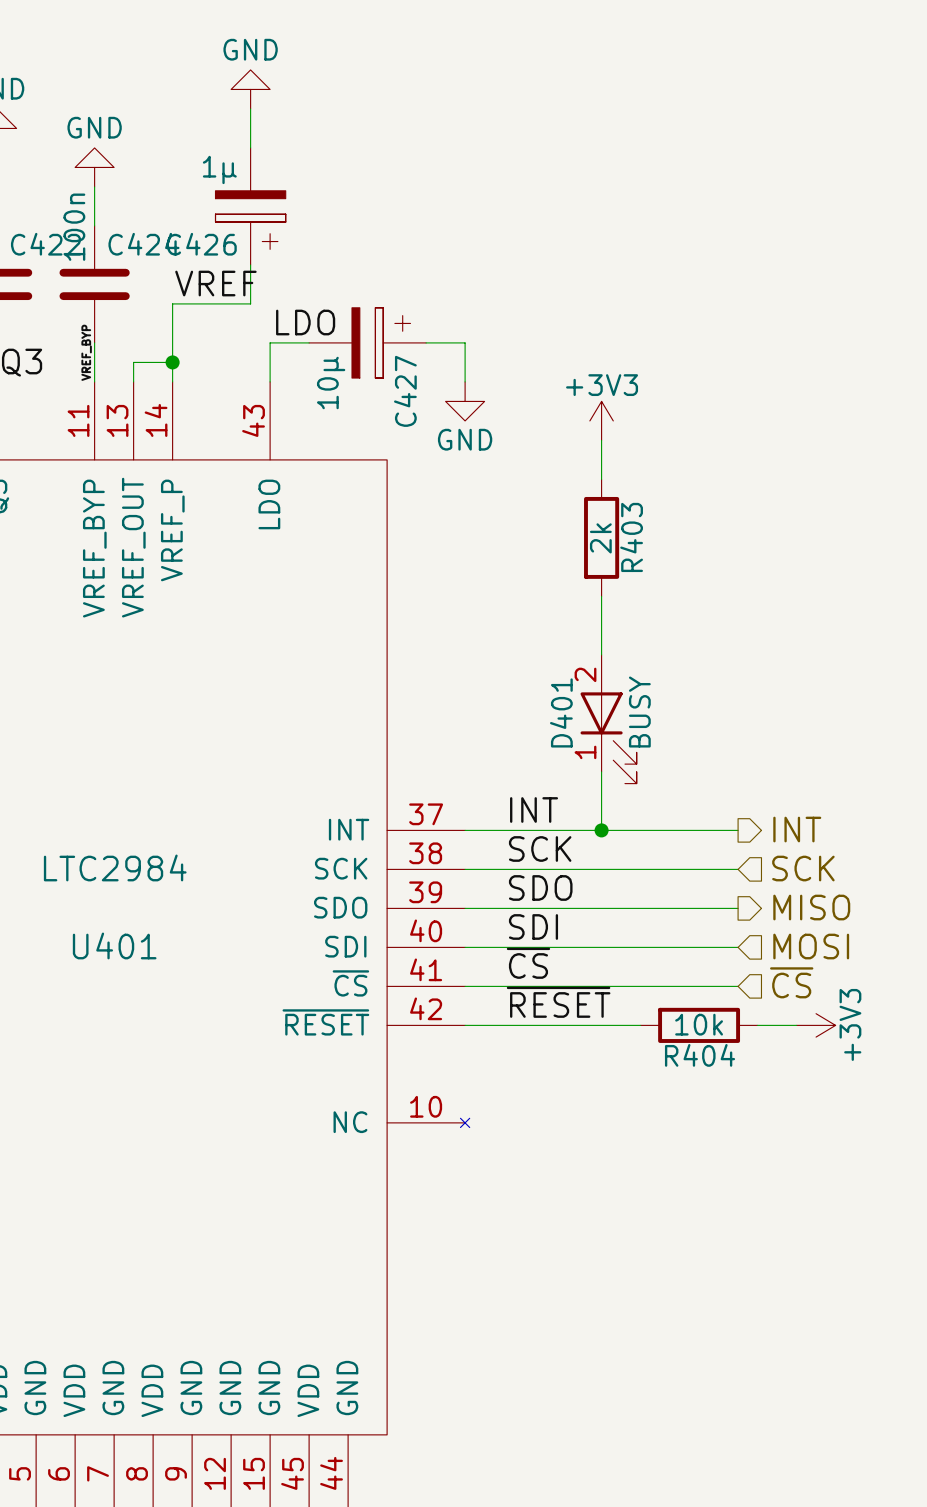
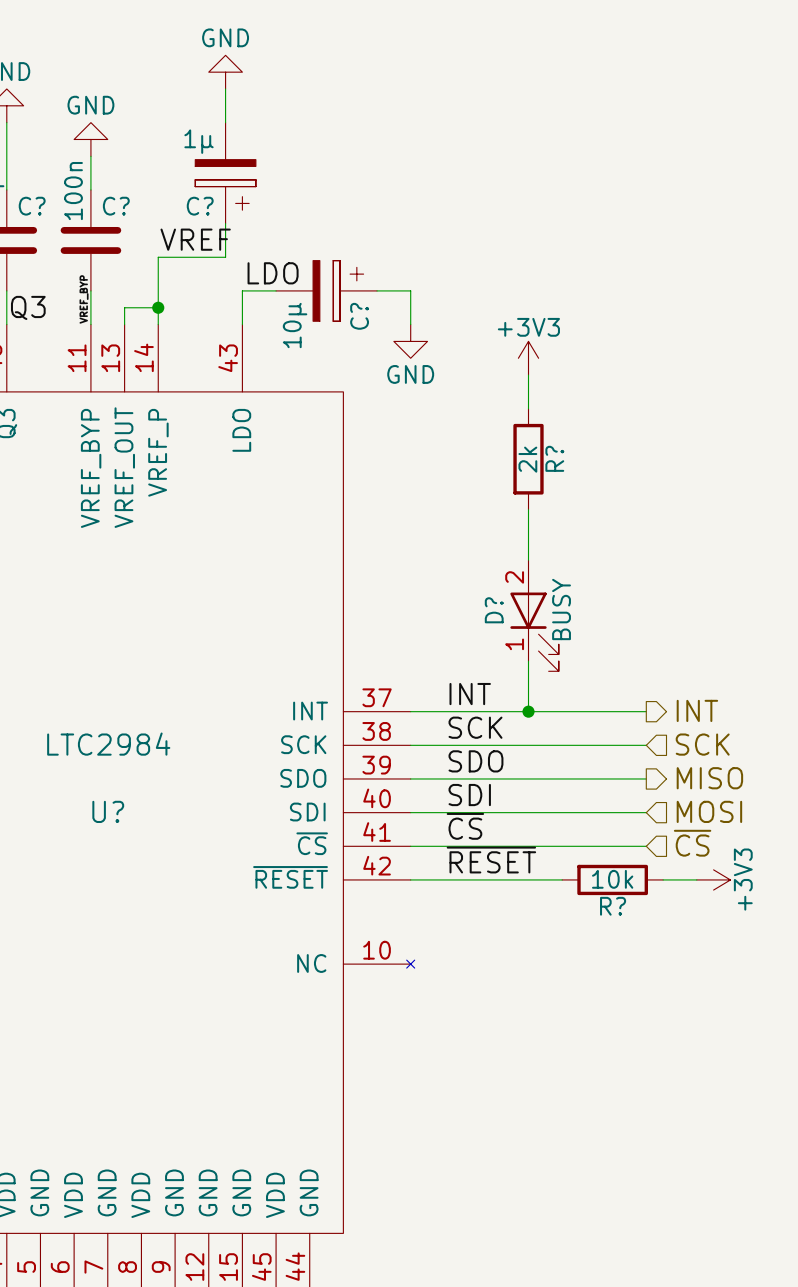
C422 name: C422 (46, 244) -> C? (32, 206)
C424 name: C424 (143, 244) -> C? (116, 206)
C426 name: C426 (201, 244) -> C? (200, 206)
C427 name: C427 (405, 391) -> C? (359, 316)
R403 name: R403 (631, 537) -> R? (554, 458)
D401 name: D401 (561, 712) -> D? (494, 610)
U401 name: U401 (114, 945) -> U? (108, 811)
R404 name: R404 (700, 1055) -> R? (613, 906)

